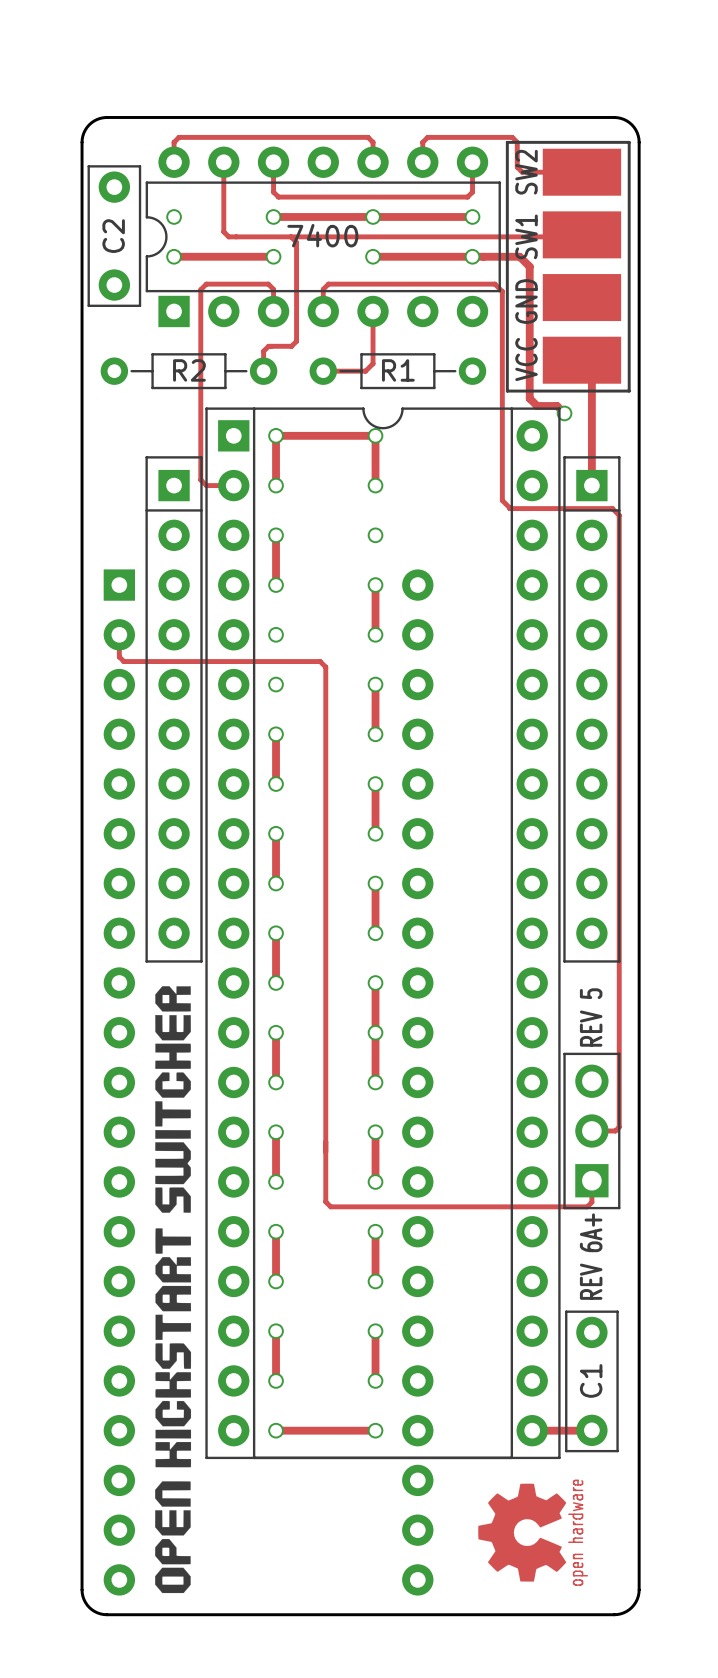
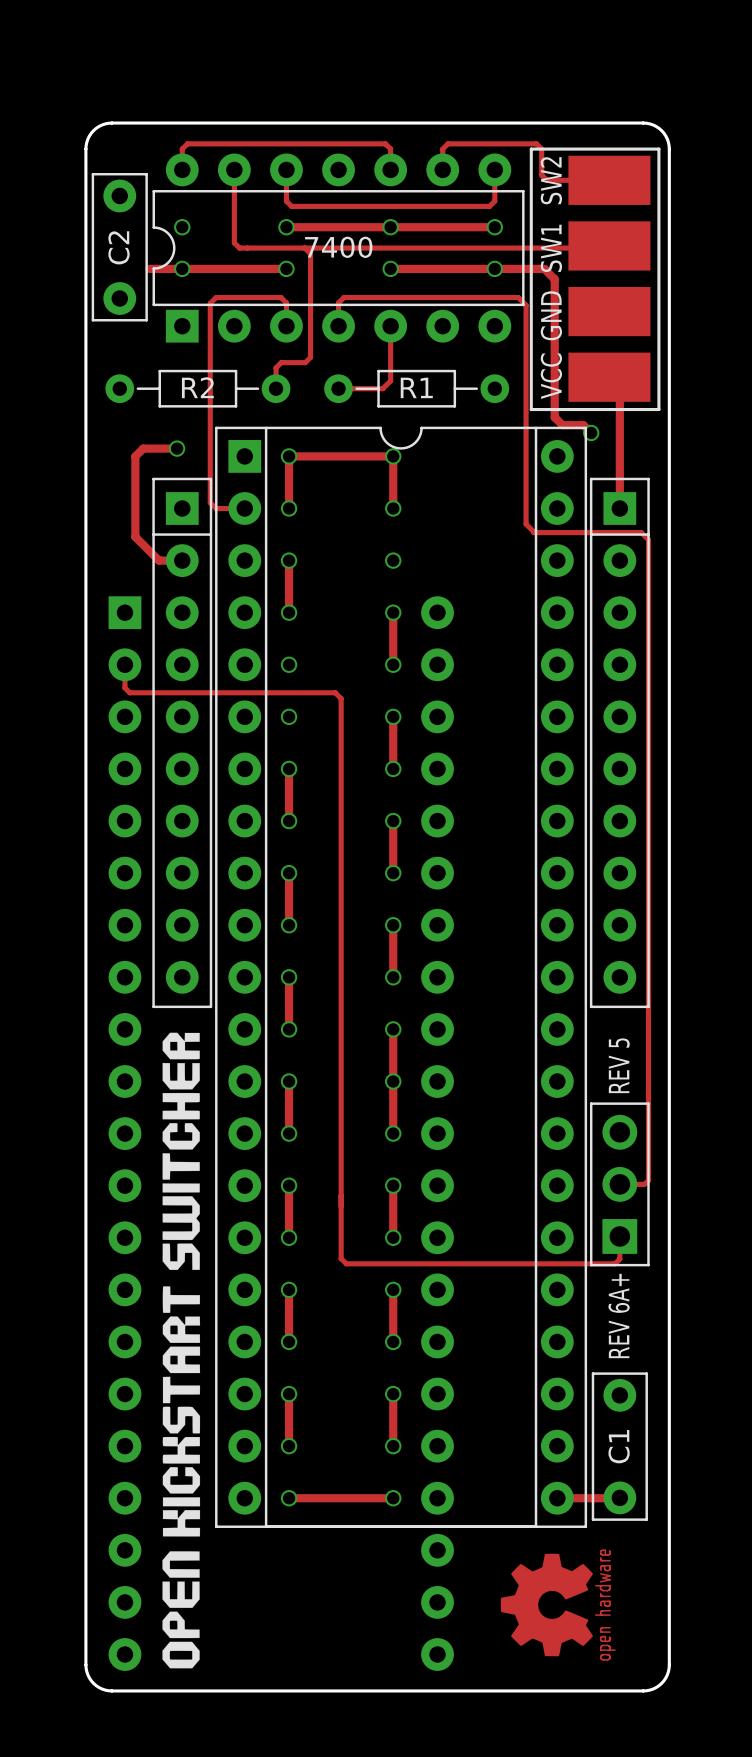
track: none -> (149, 268) (182, 268)
track: none -> (177, 448) (143, 448) (135, 456) (135, 536) (159, 560) (182, 560)
via: none -> (177, 448)

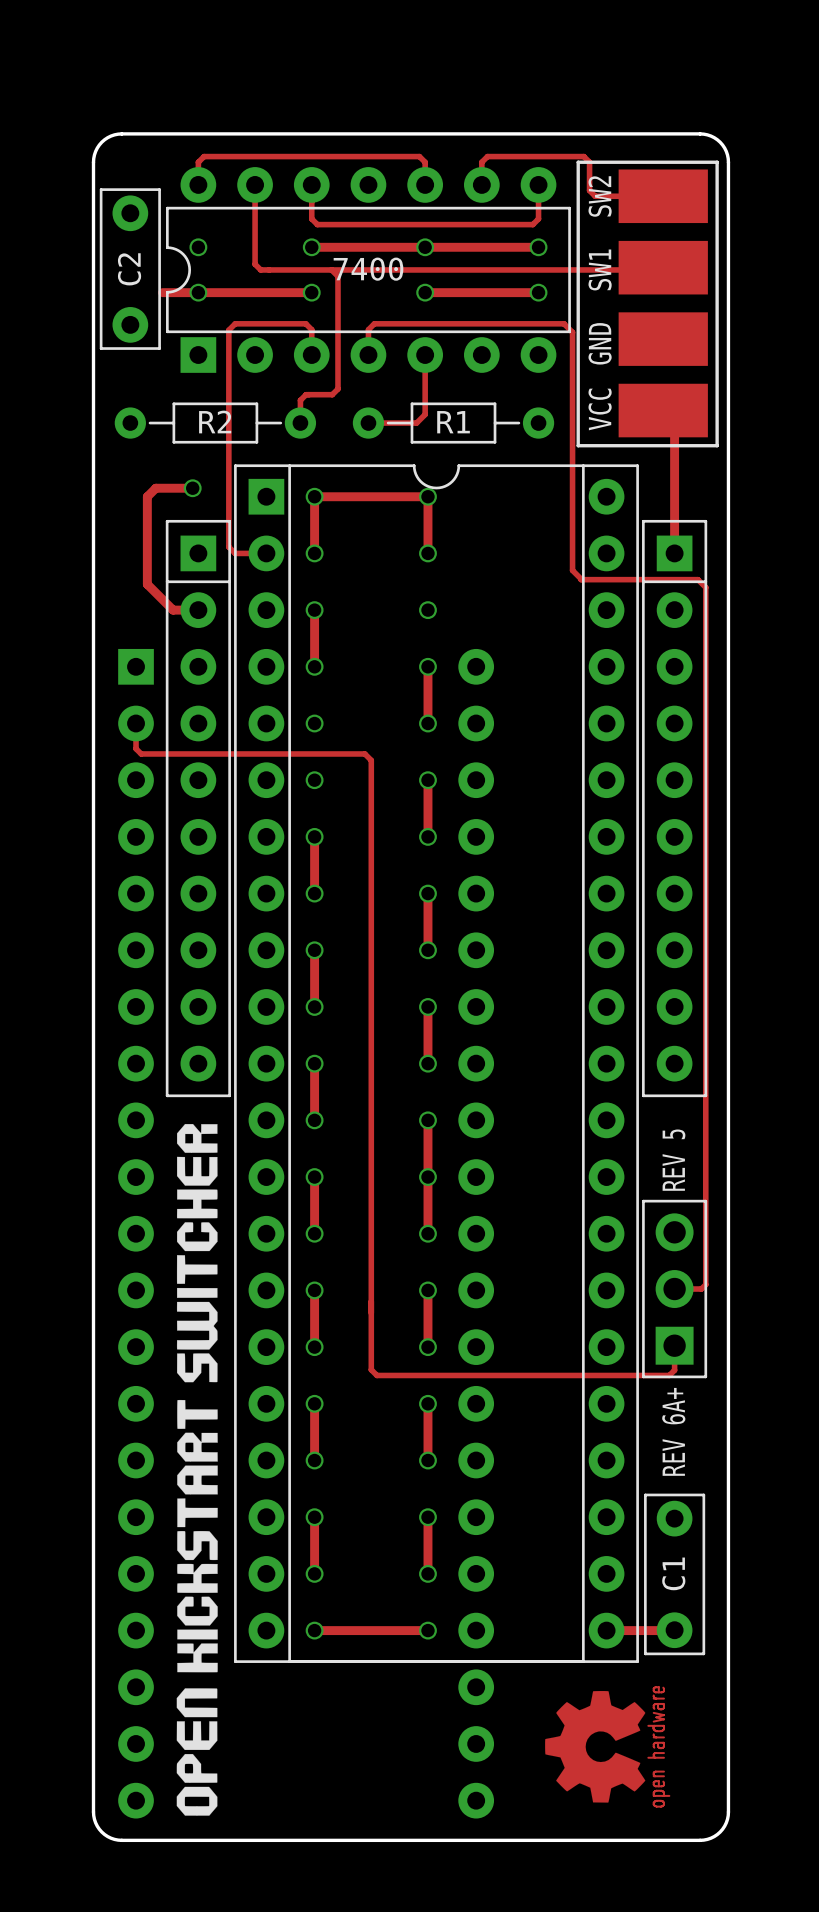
track: (494, 268) (544, 268) (554, 279) (554, 417) (562, 425) (583, 425) (591, 432) -> none
via: (591, 432) -> none

